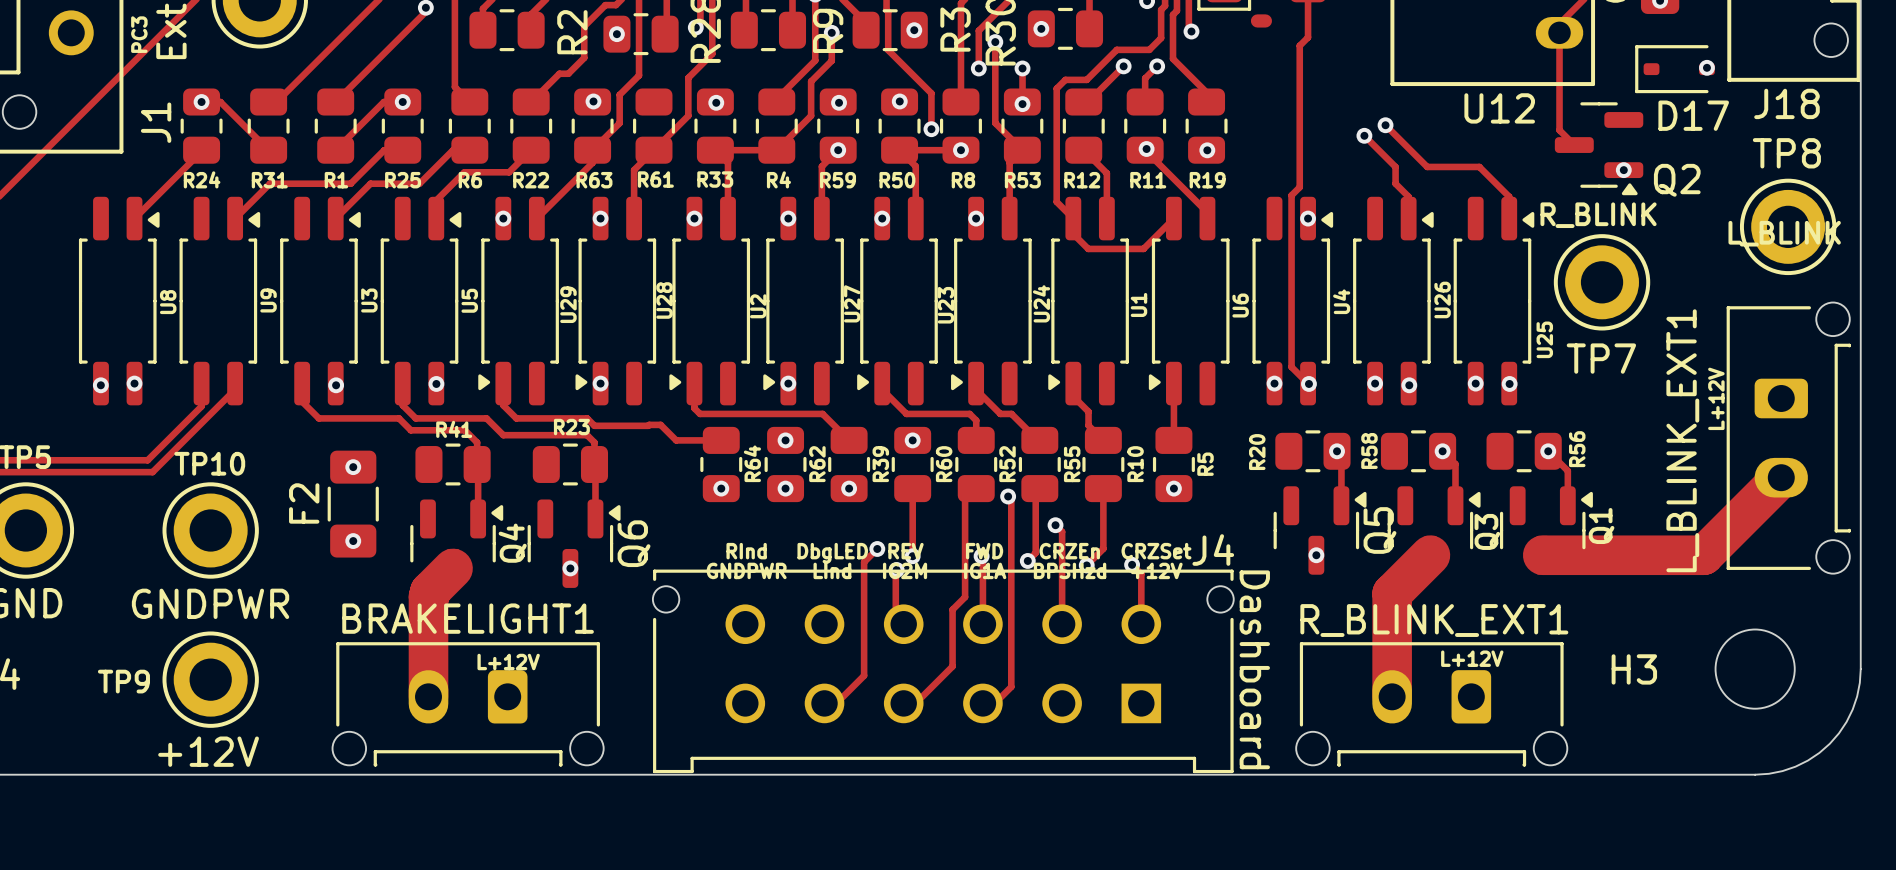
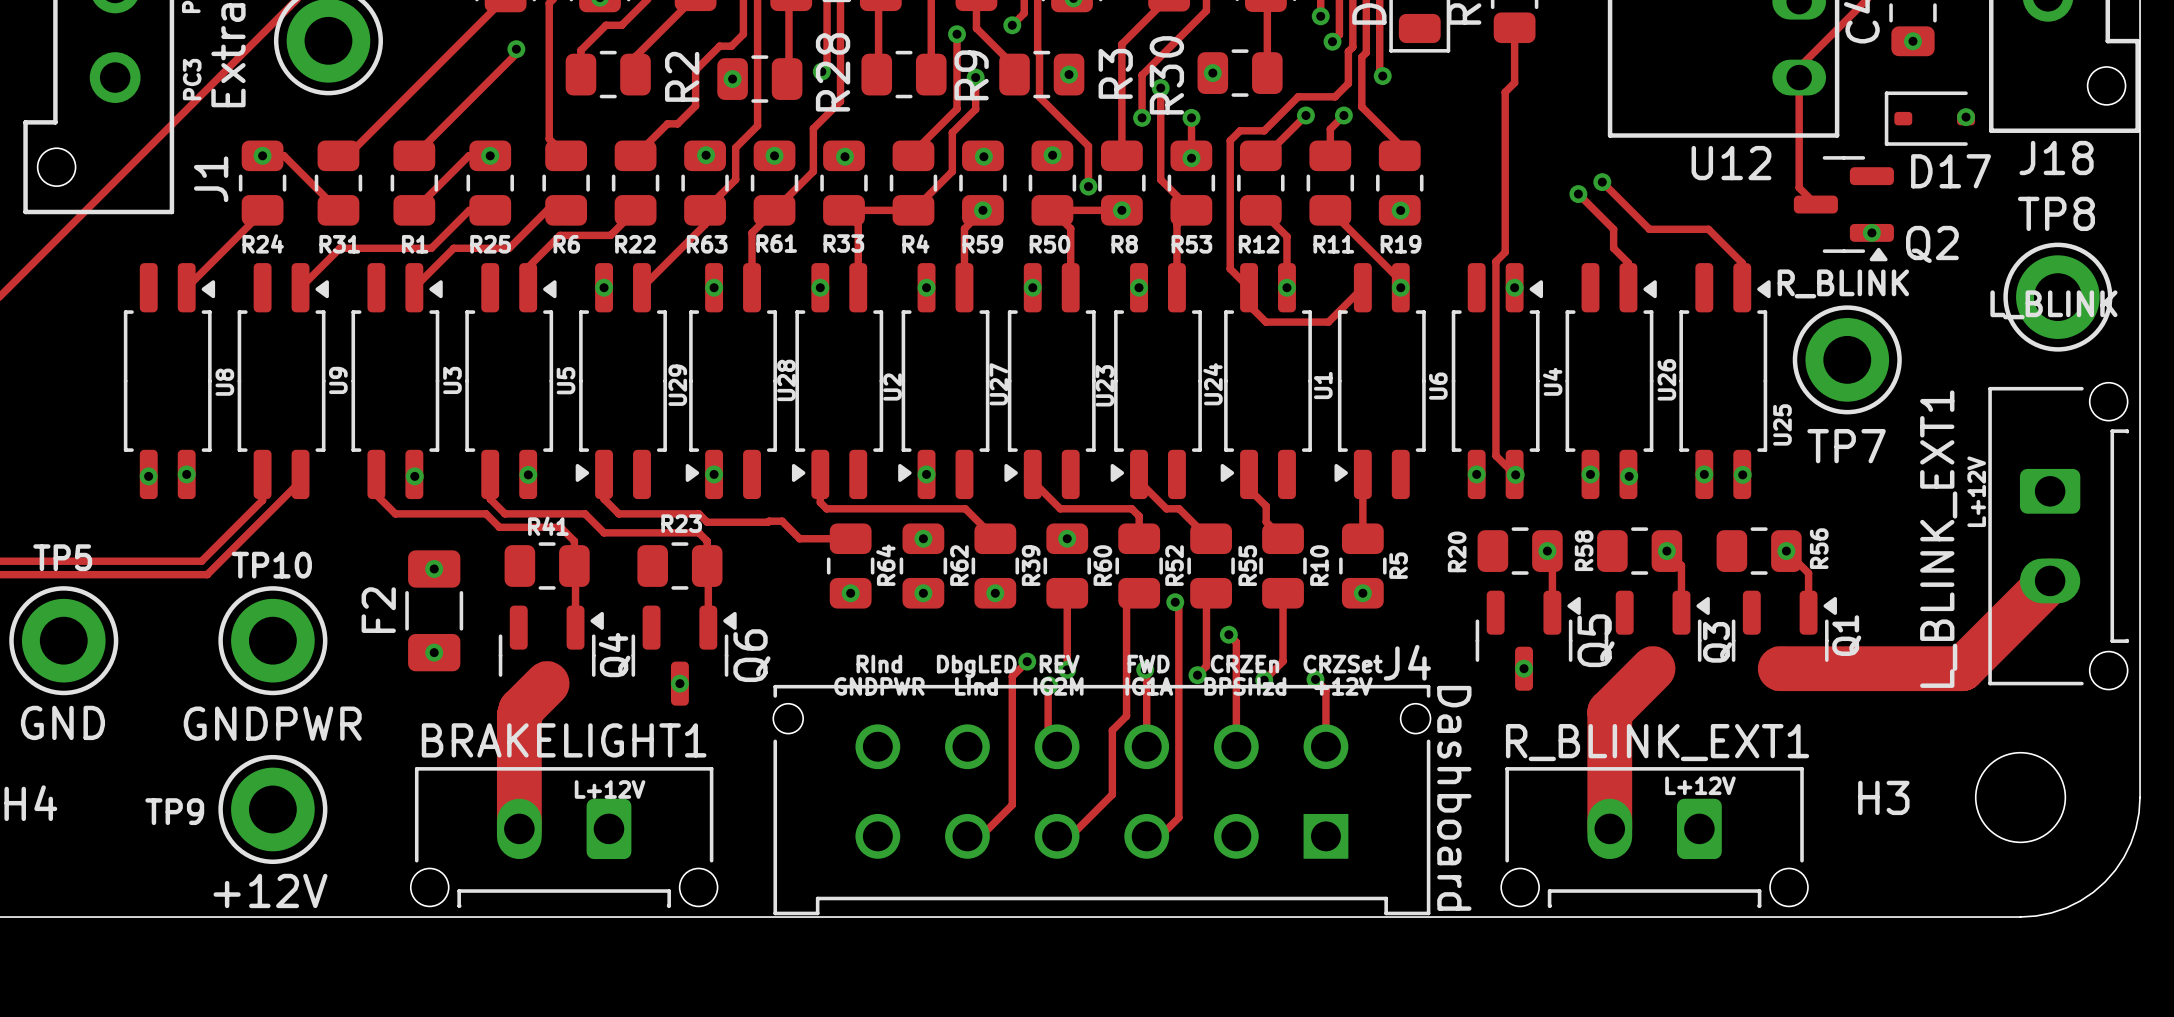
track: (1257, 20) (1265, 20) -> none
via: none -> (774, 155)
via: (1146, 149) -> none
via: none -> (1286, 287)
via: none -> (1400, 287)

